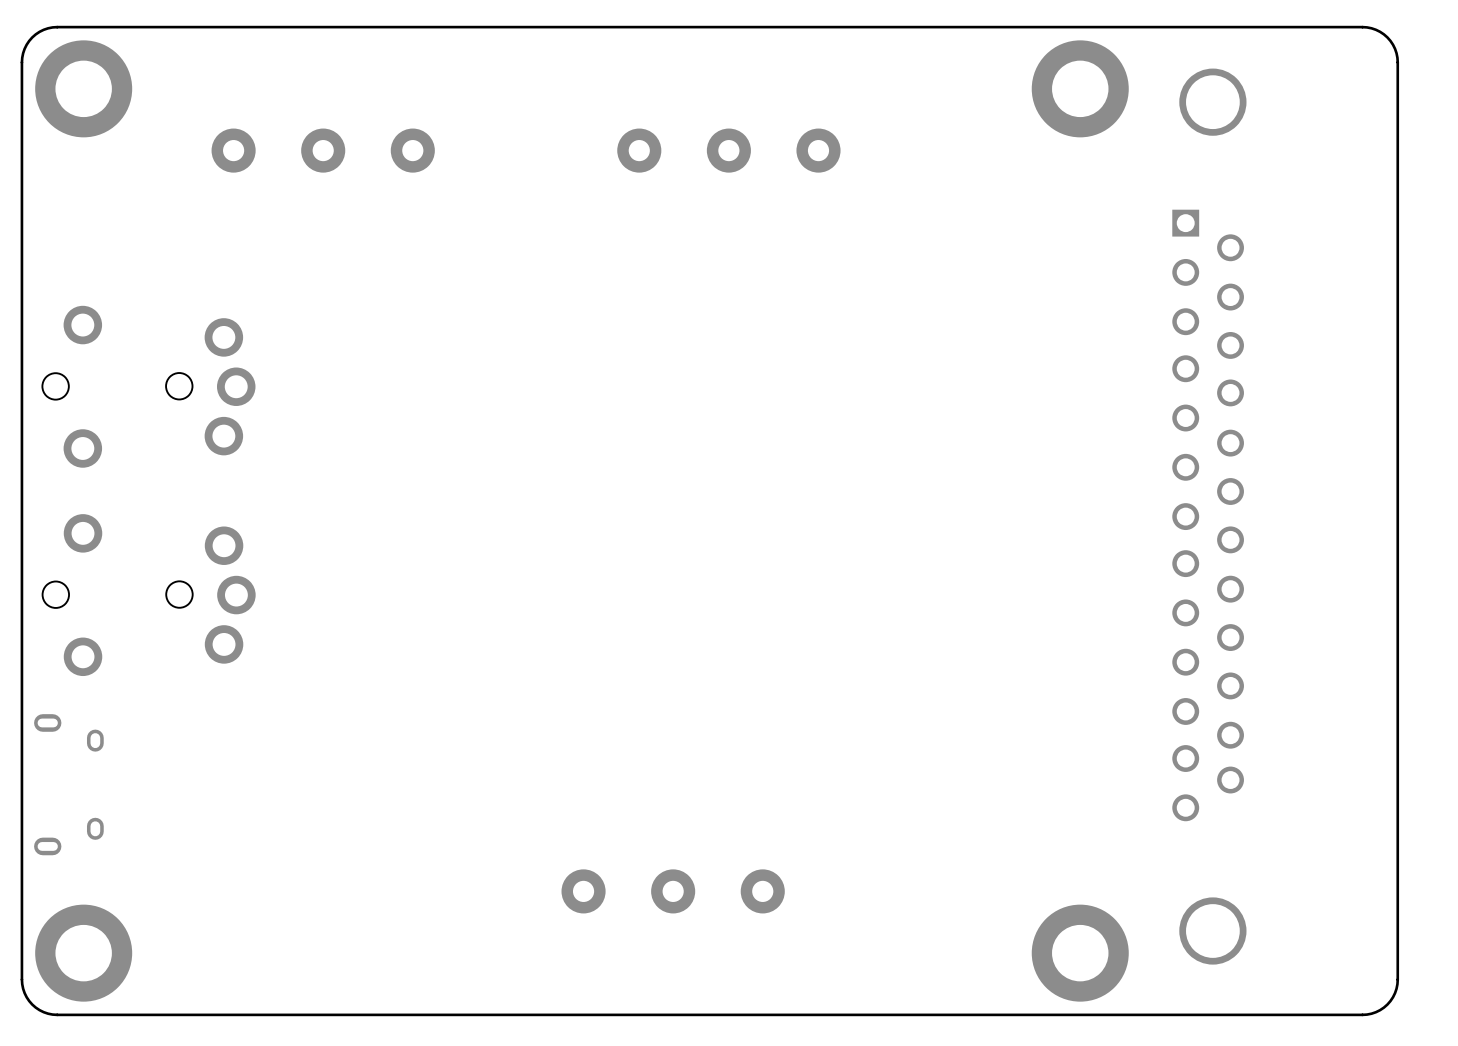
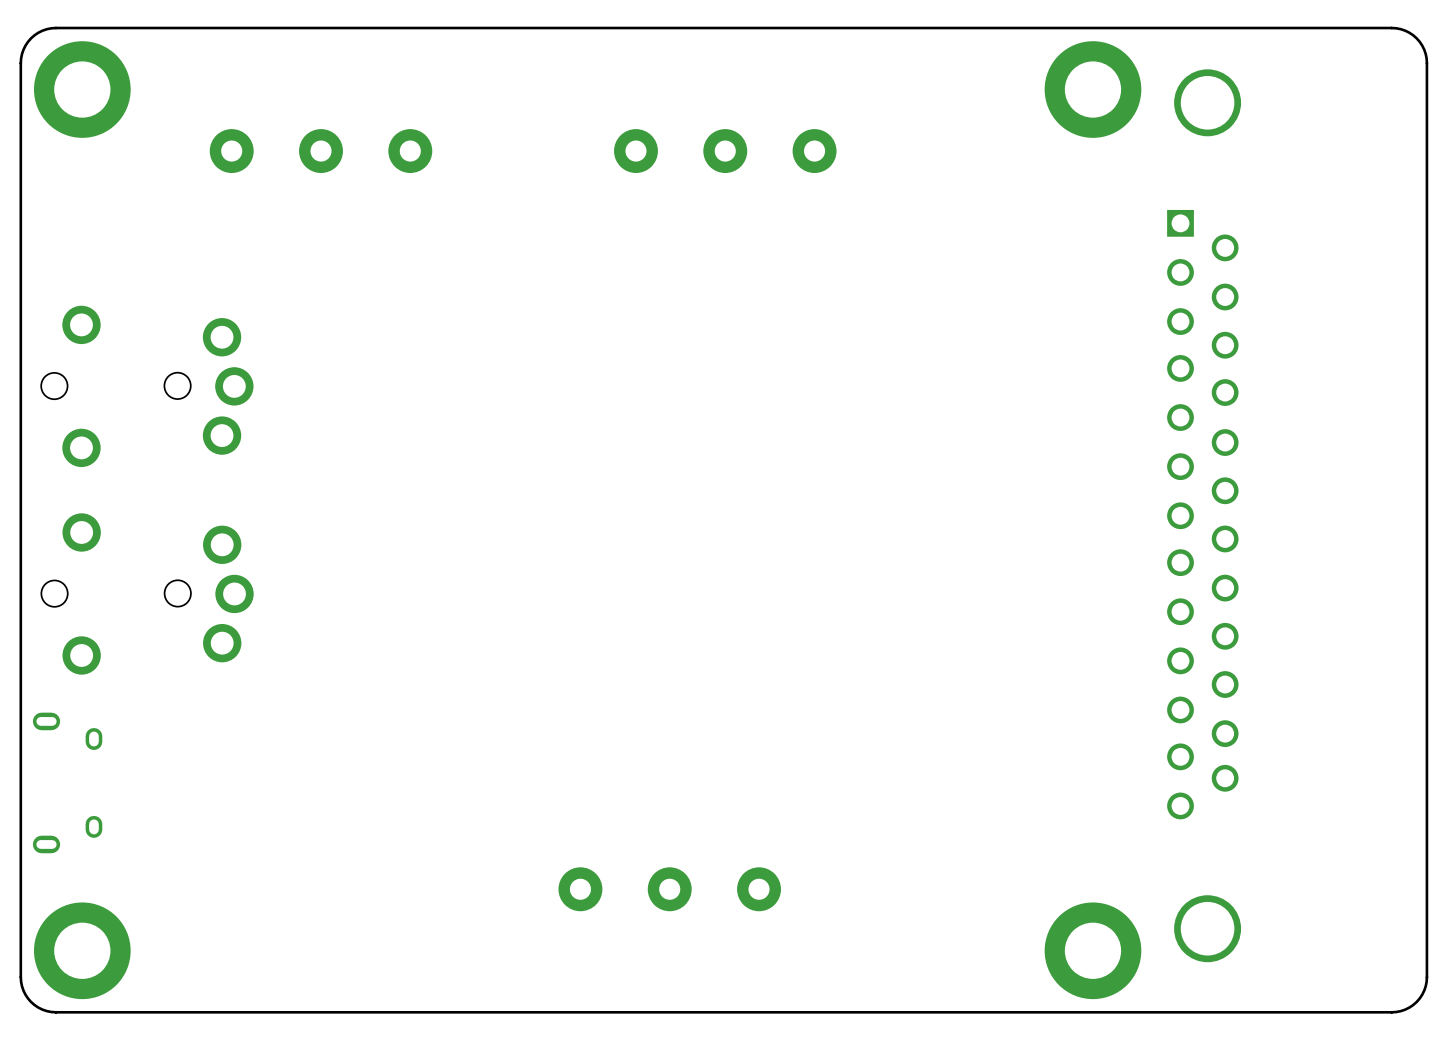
board edge: (1362, 27) (1375, 29) (1387, 37) (1395, 48) (1397, 62) (1397, 979) (1395, 993) (1387, 1004) (1375, 1012) (1362, 1014) -> (1356, 28) (1396, 28) (1409, 32) (1422, 45) (1426, 63) (1426, 981) (1419, 998) (1405, 1009) (1391, 1012) (1356, 1012)
part position: (1080, 88) -> (1092, 89)
part position: (1080, 953) -> (1092, 950)

